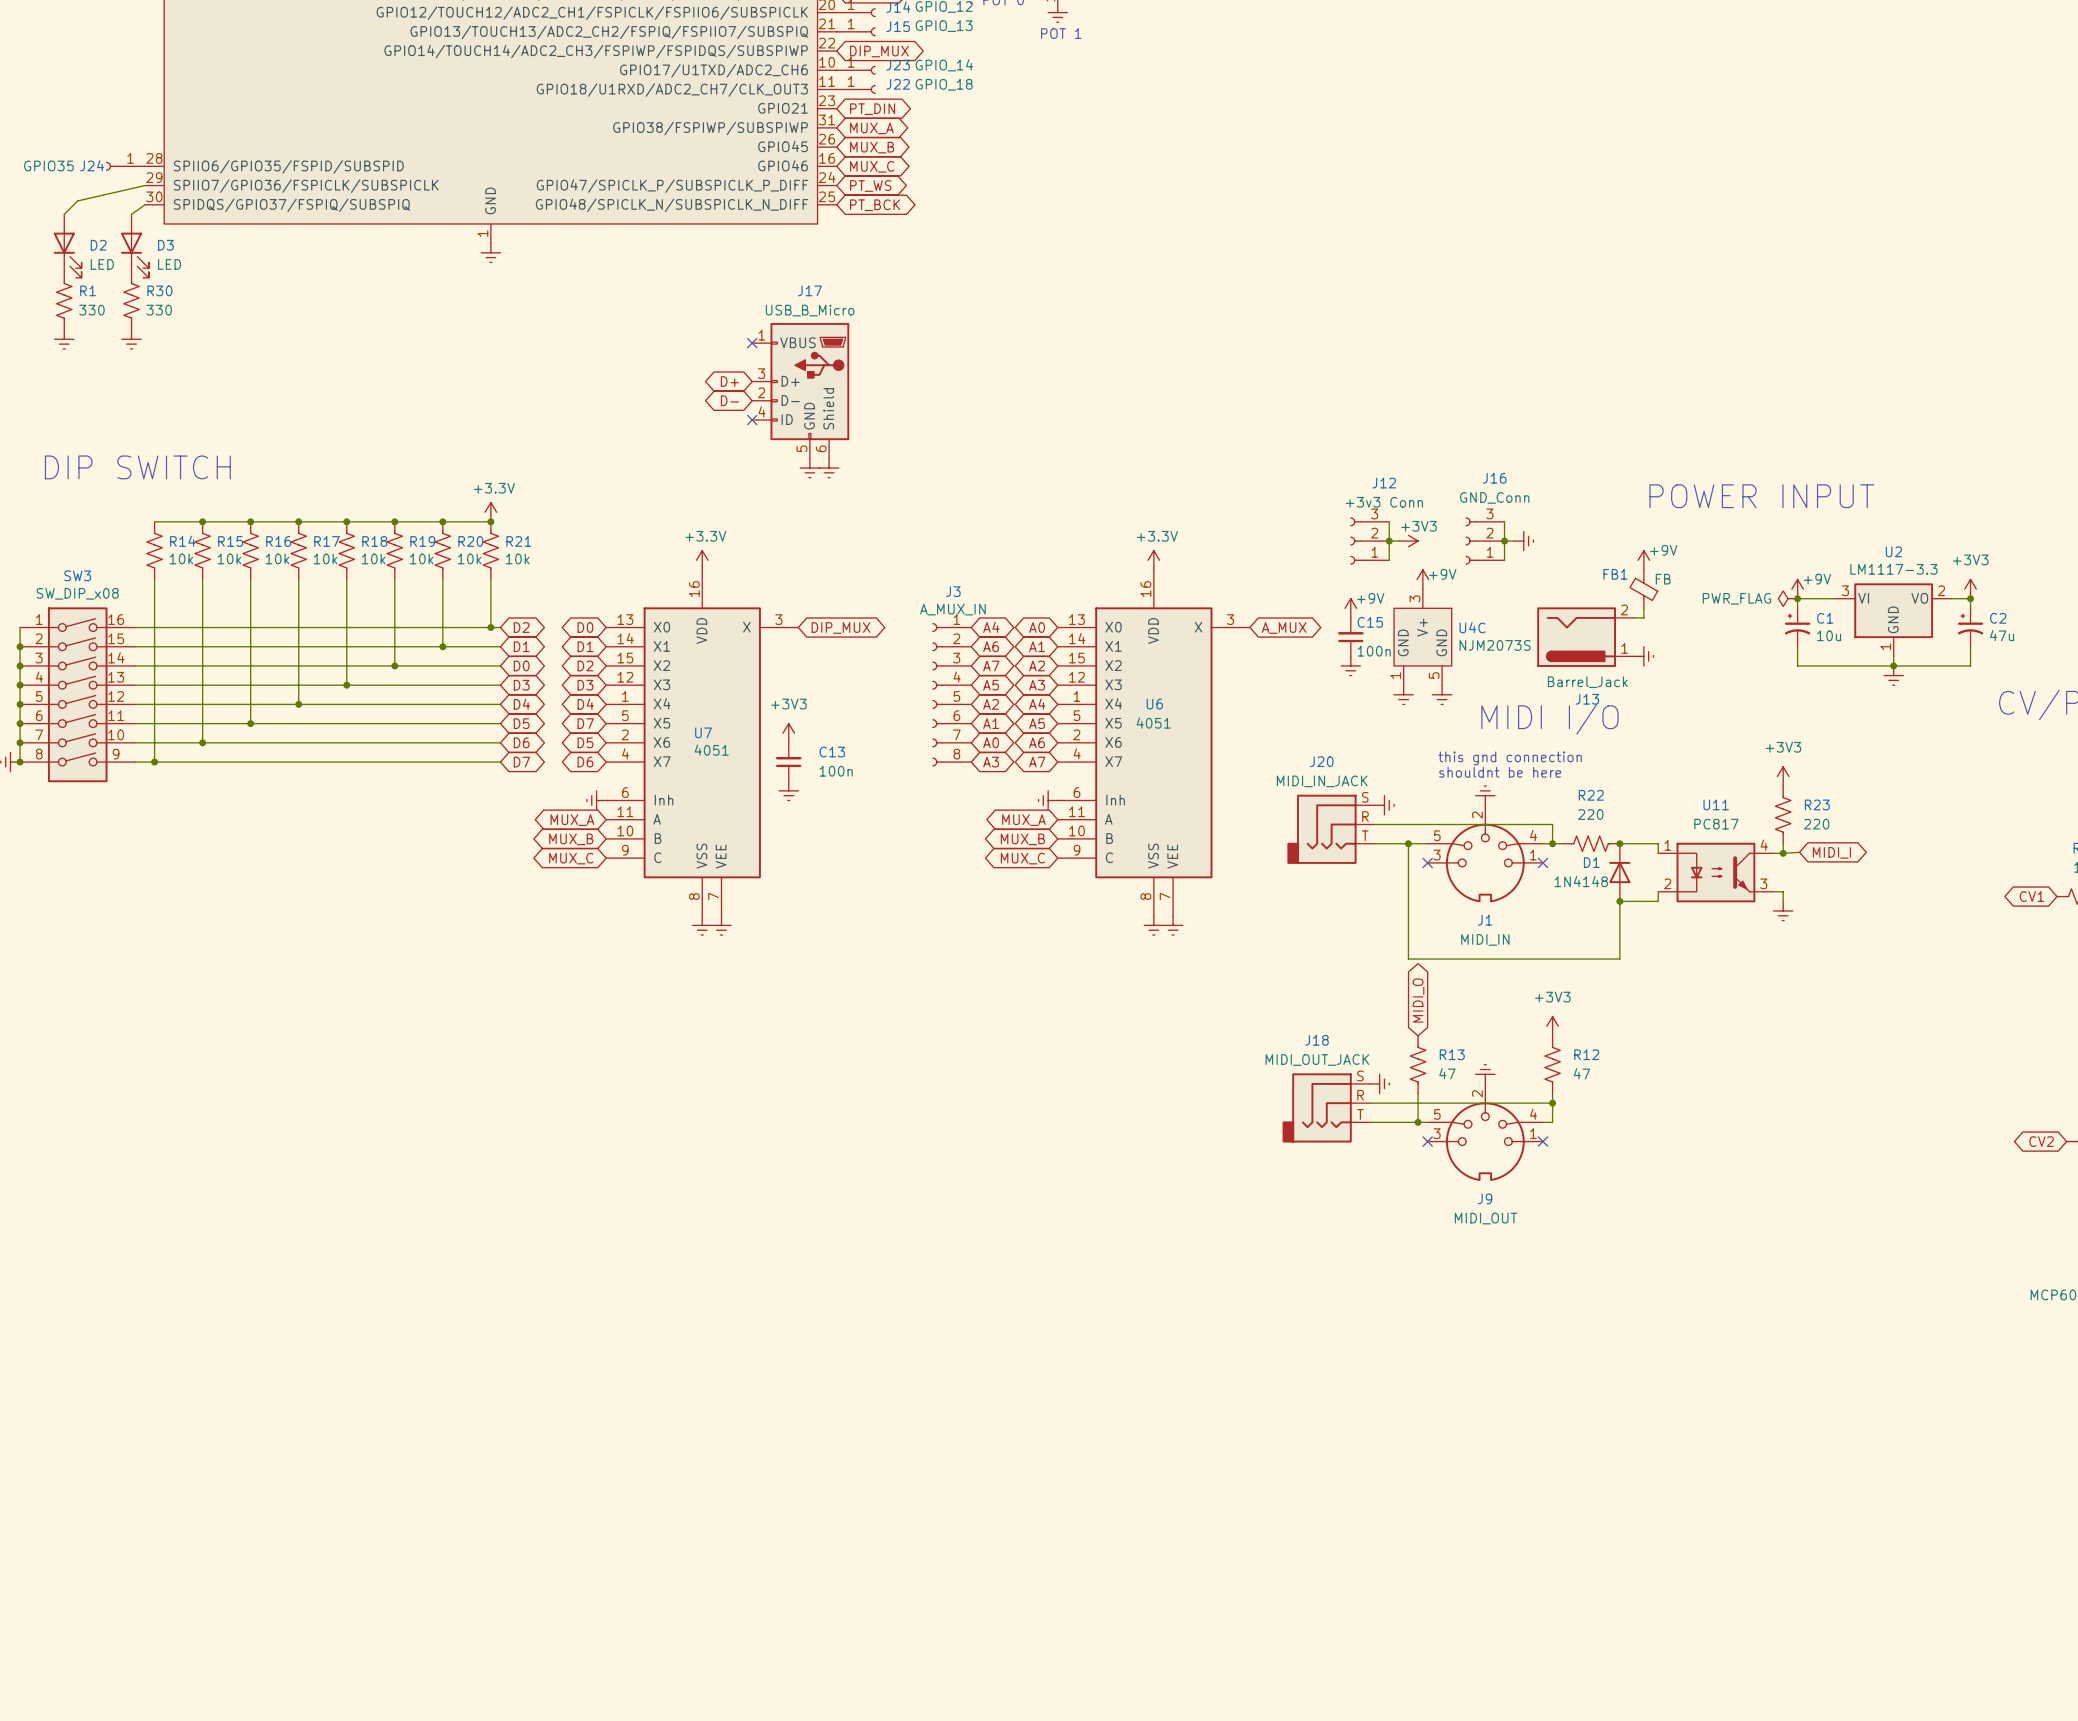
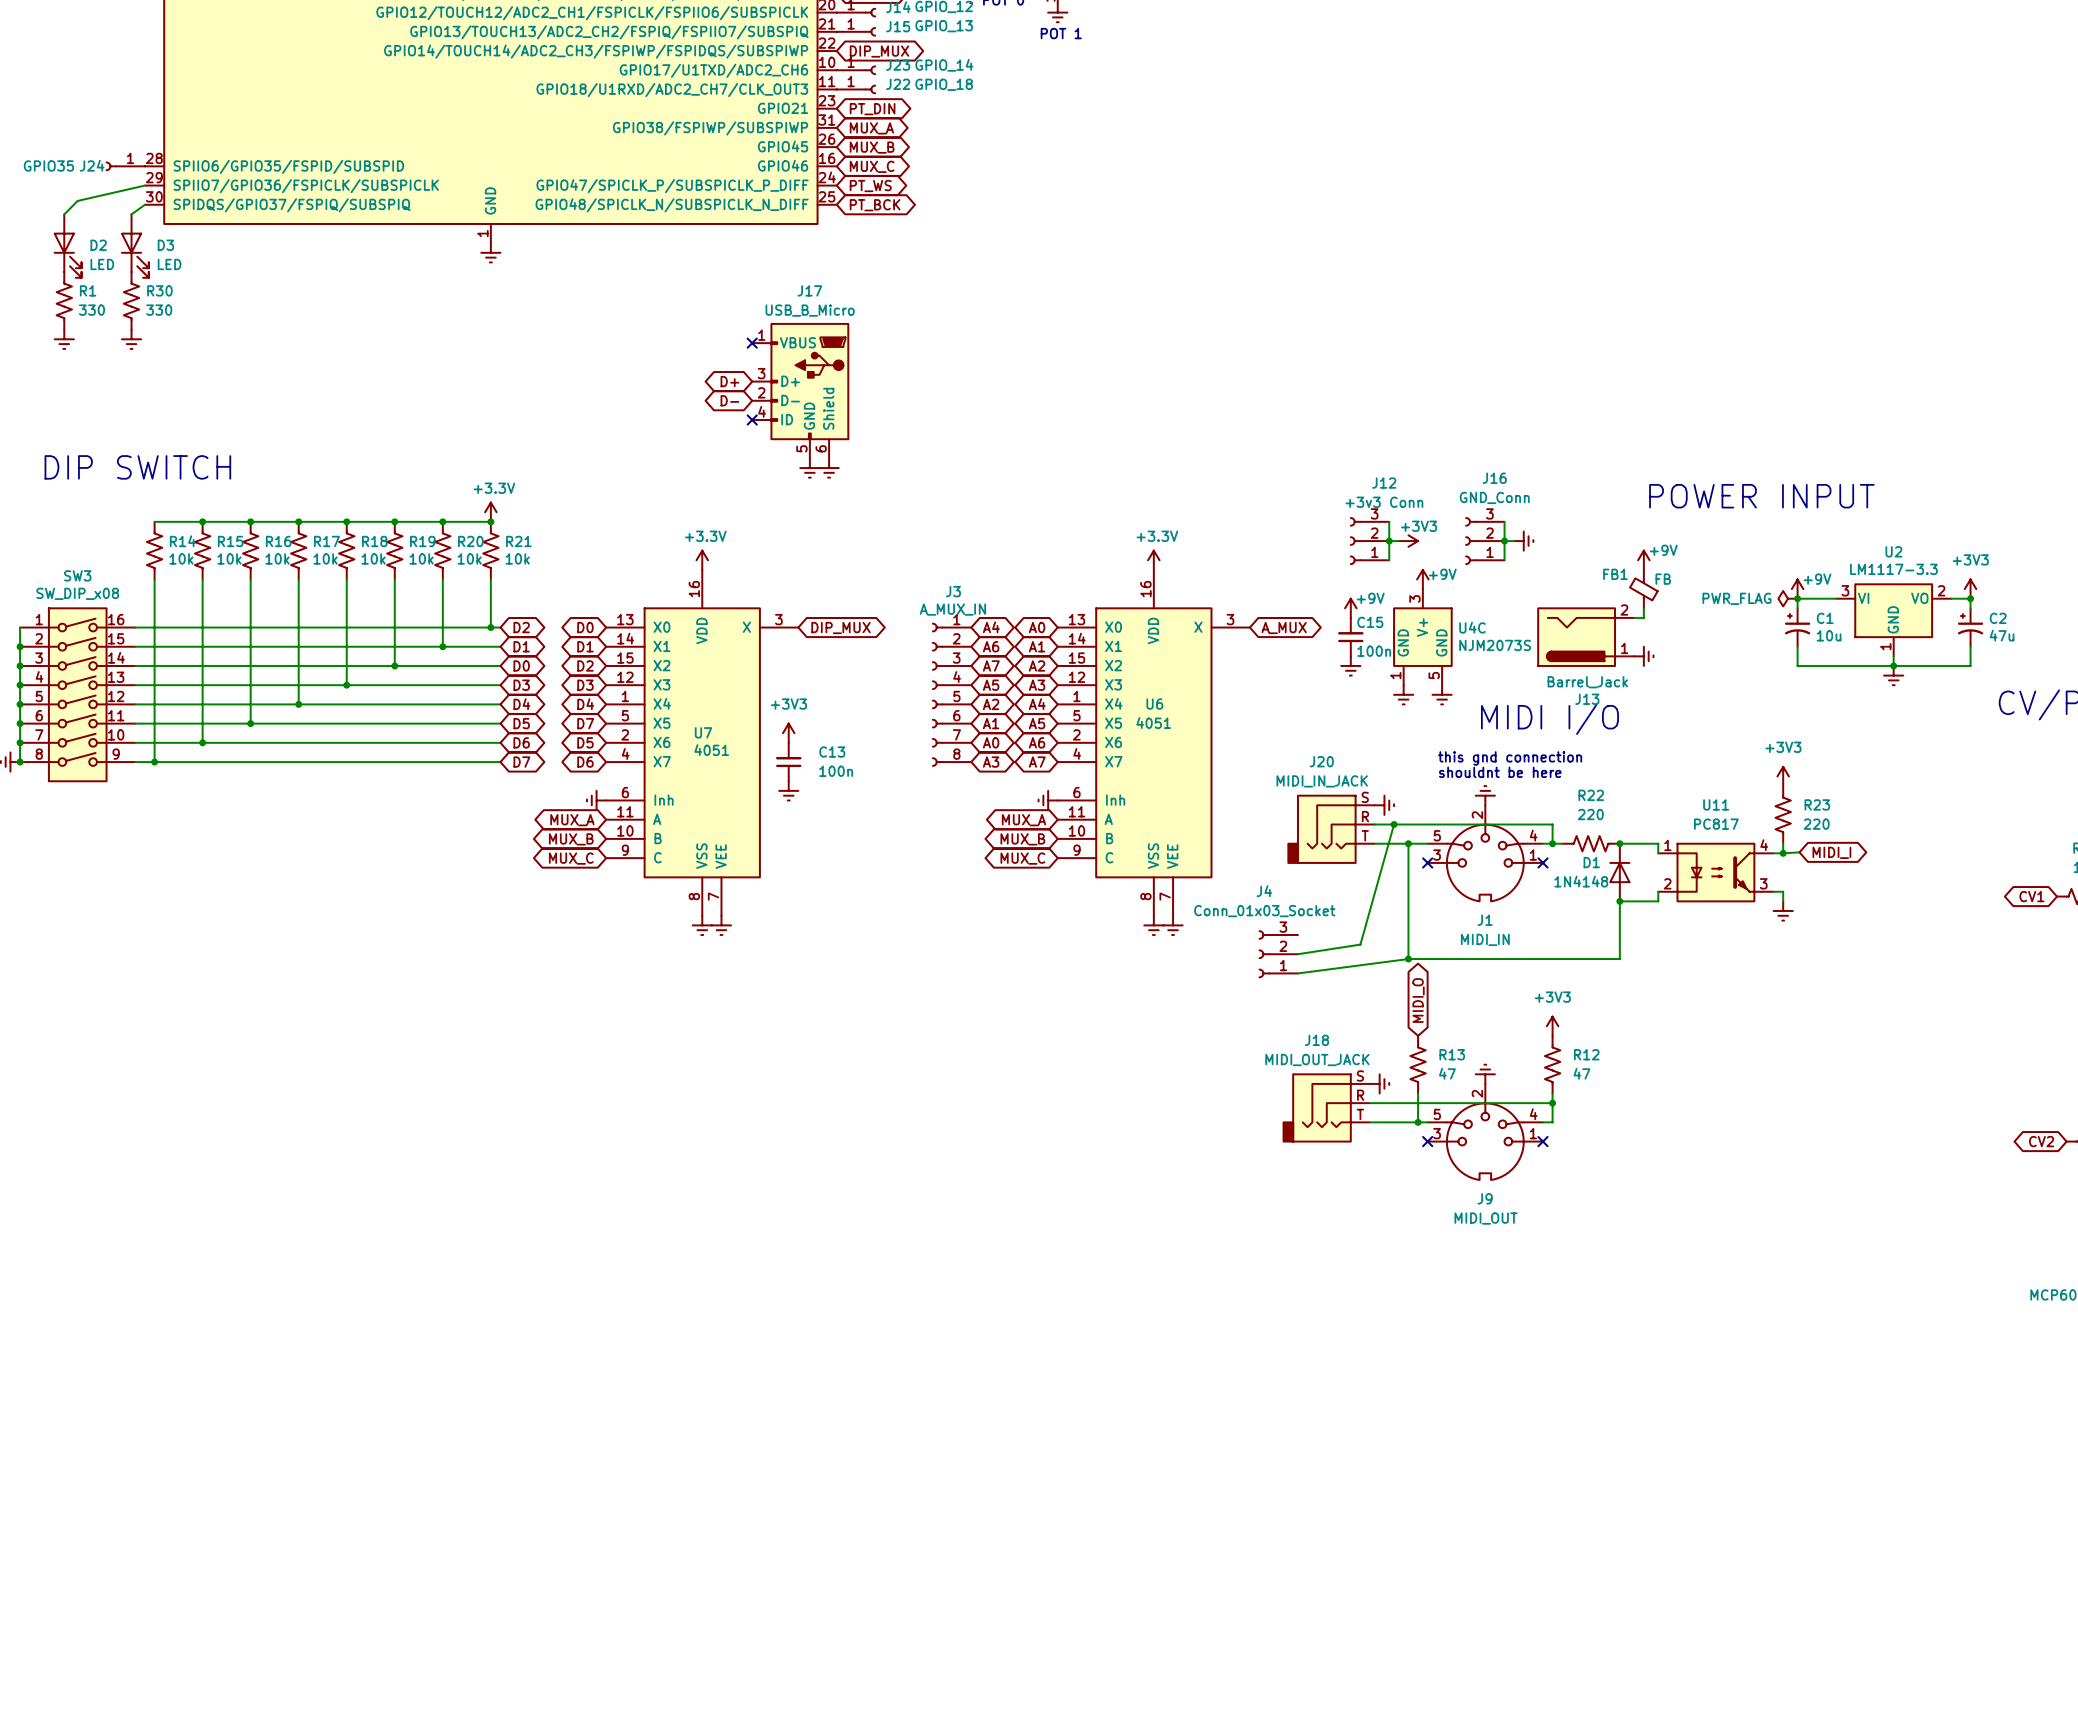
wire: none -> (1394, 824) (1360, 944) (1297, 954)
junction: none -> (1394, 824)
J4: none -> Conn_01x03_Socket (1278, 954)
wire: none -> (1408, 959) (1297, 973)
junction: none -> (1408, 959)

